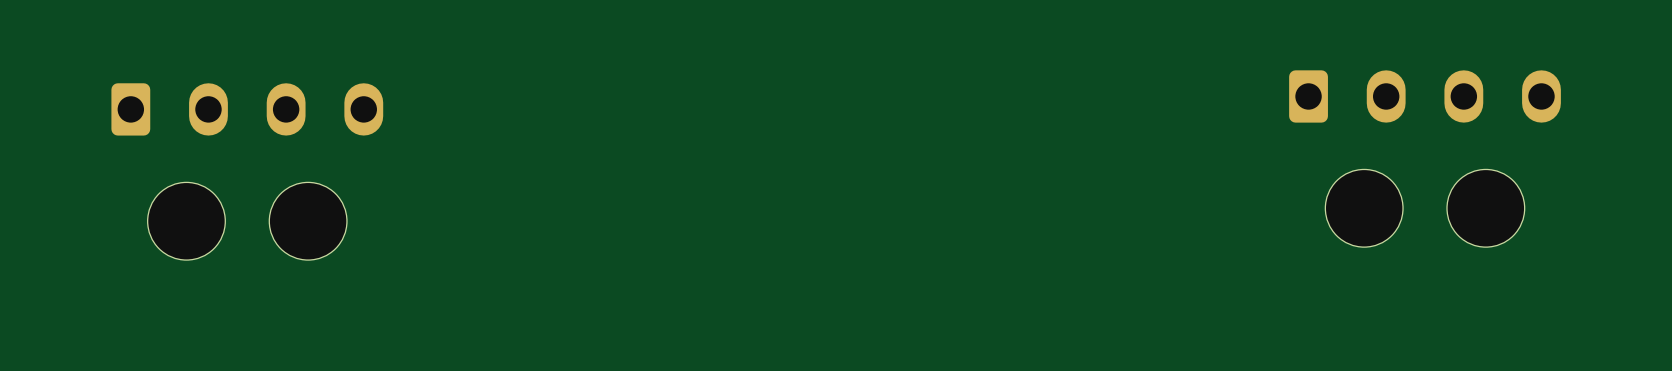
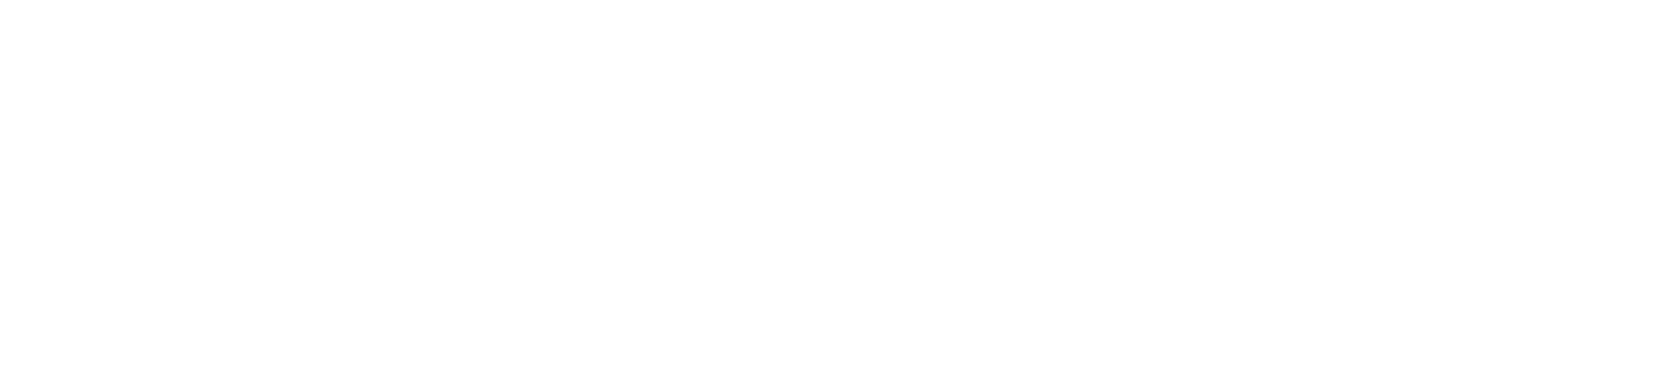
part: (1425, 158) -> none
part: (247, 171) -> none

